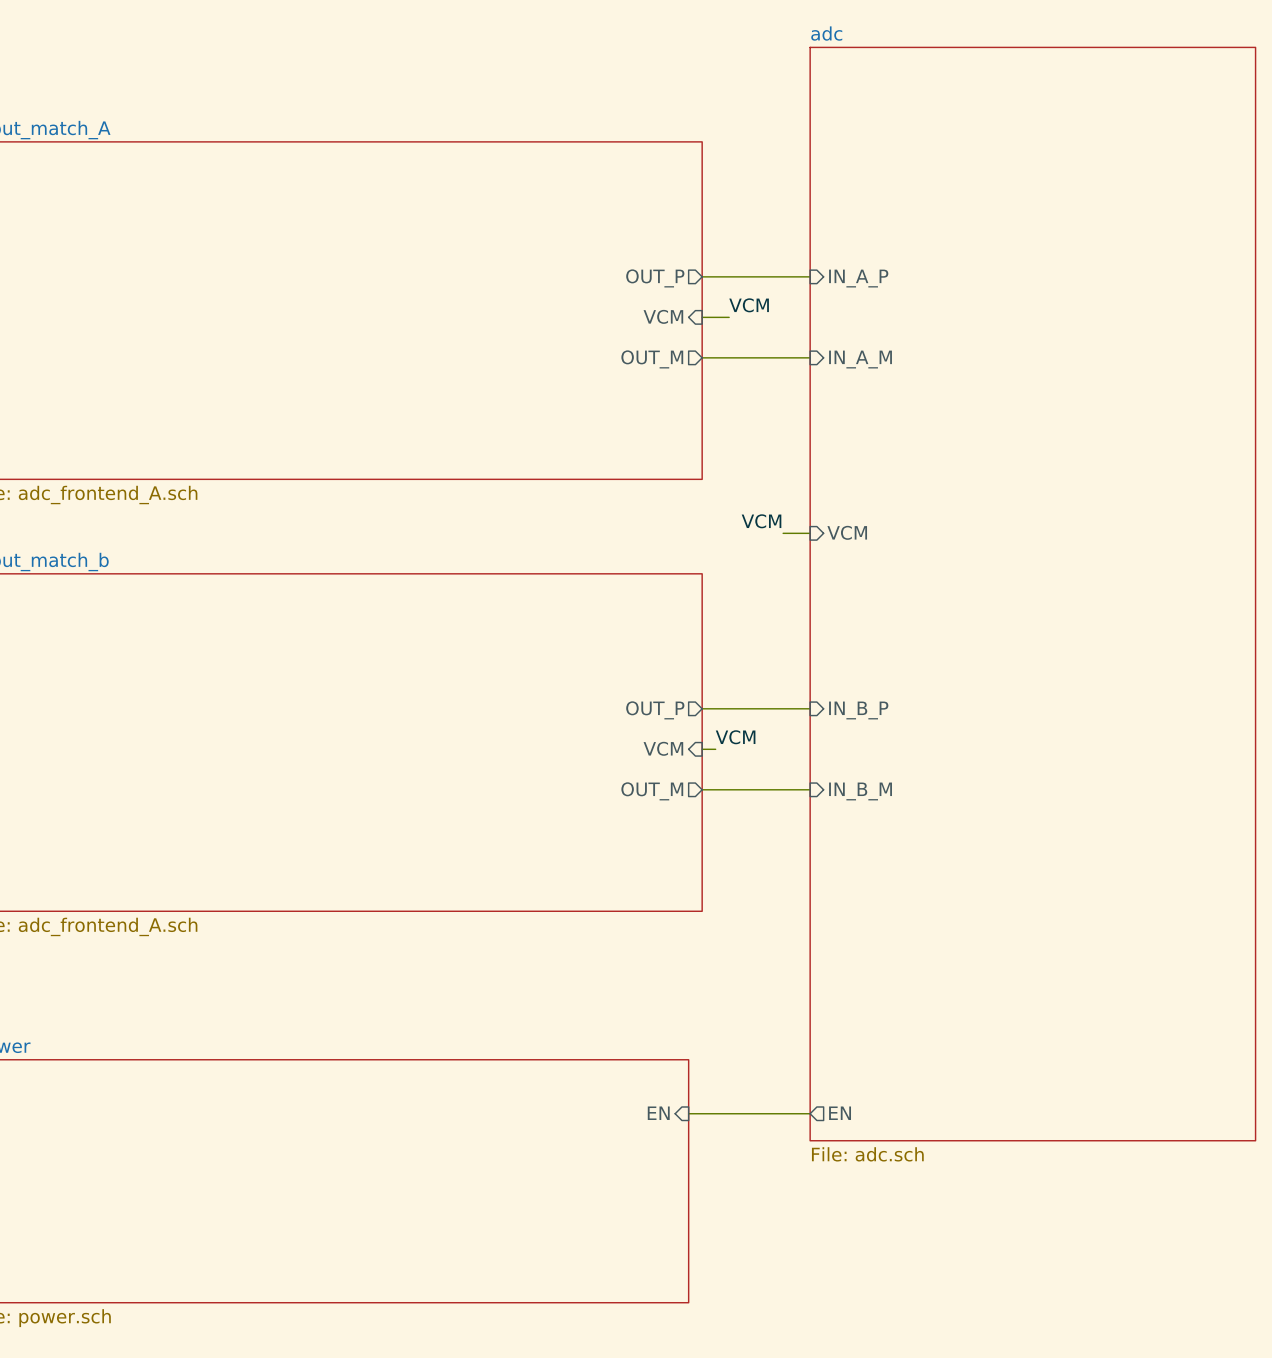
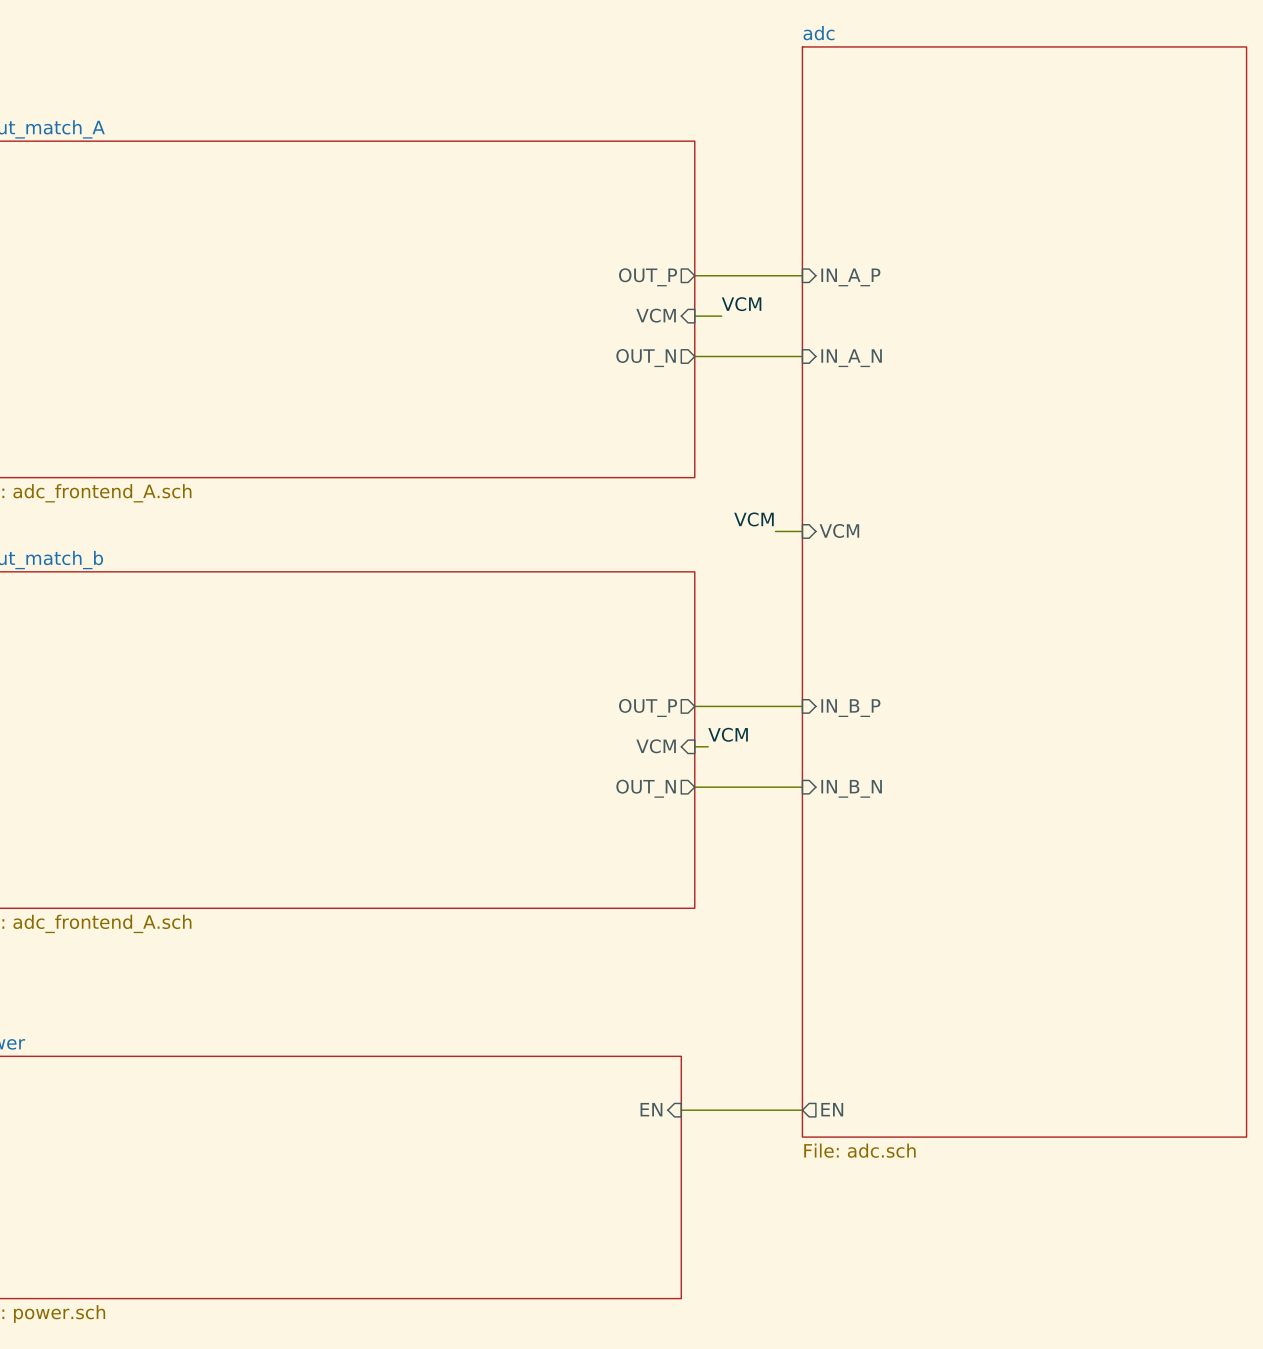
sheet pin: OUT_M (652, 359) -> OUT_N (646, 358)
sheet pin: IN_A_M (860, 359) -> IN_A_N (851, 358)
sheet pin: OUT_M (652, 791) -> OUT_N (646, 788)
sheet pin: IN_B_M (860, 791) -> IN_B_N (851, 788)

